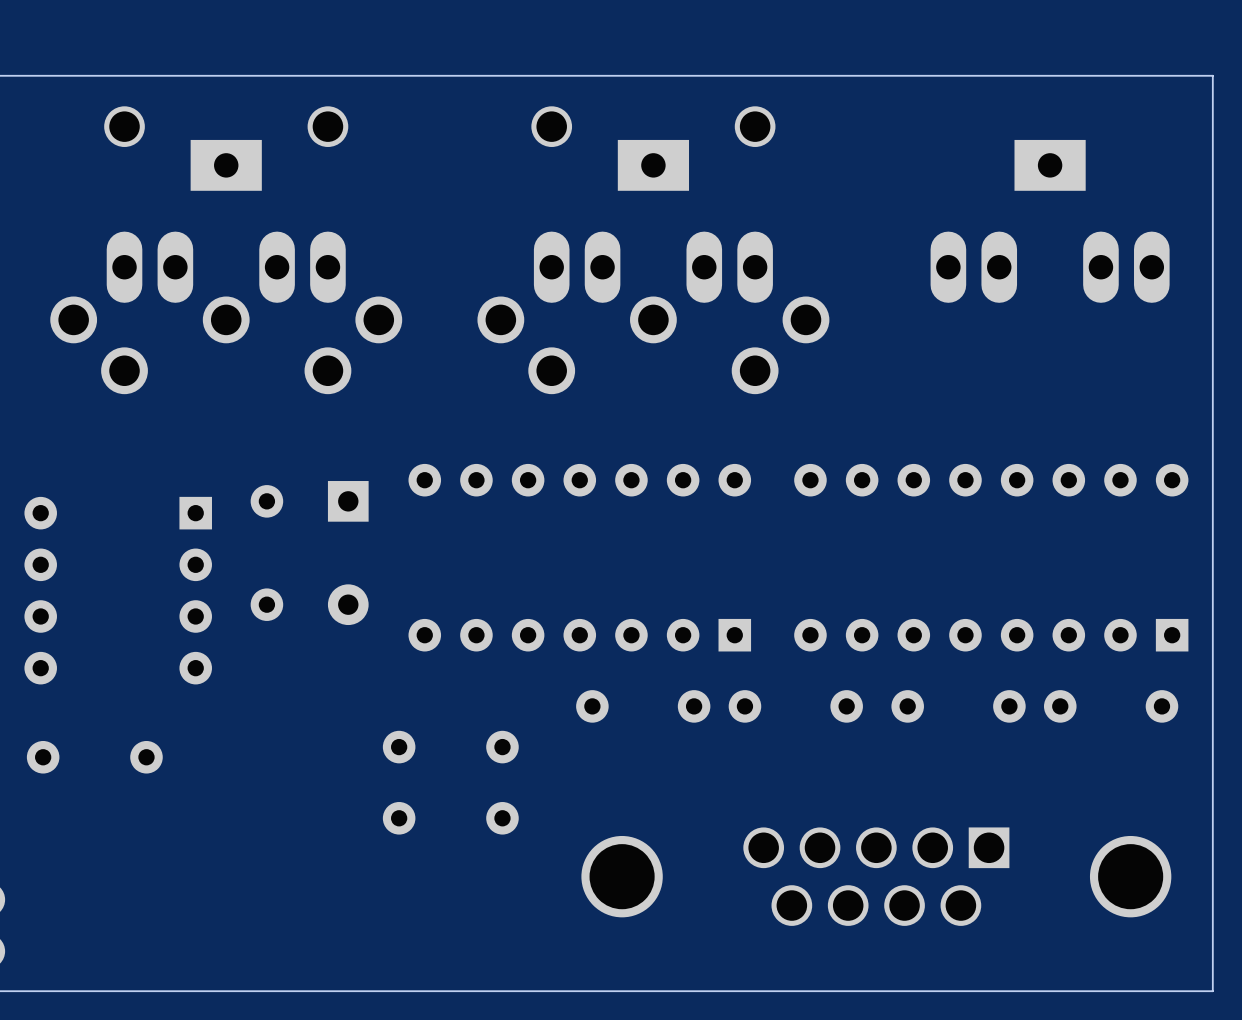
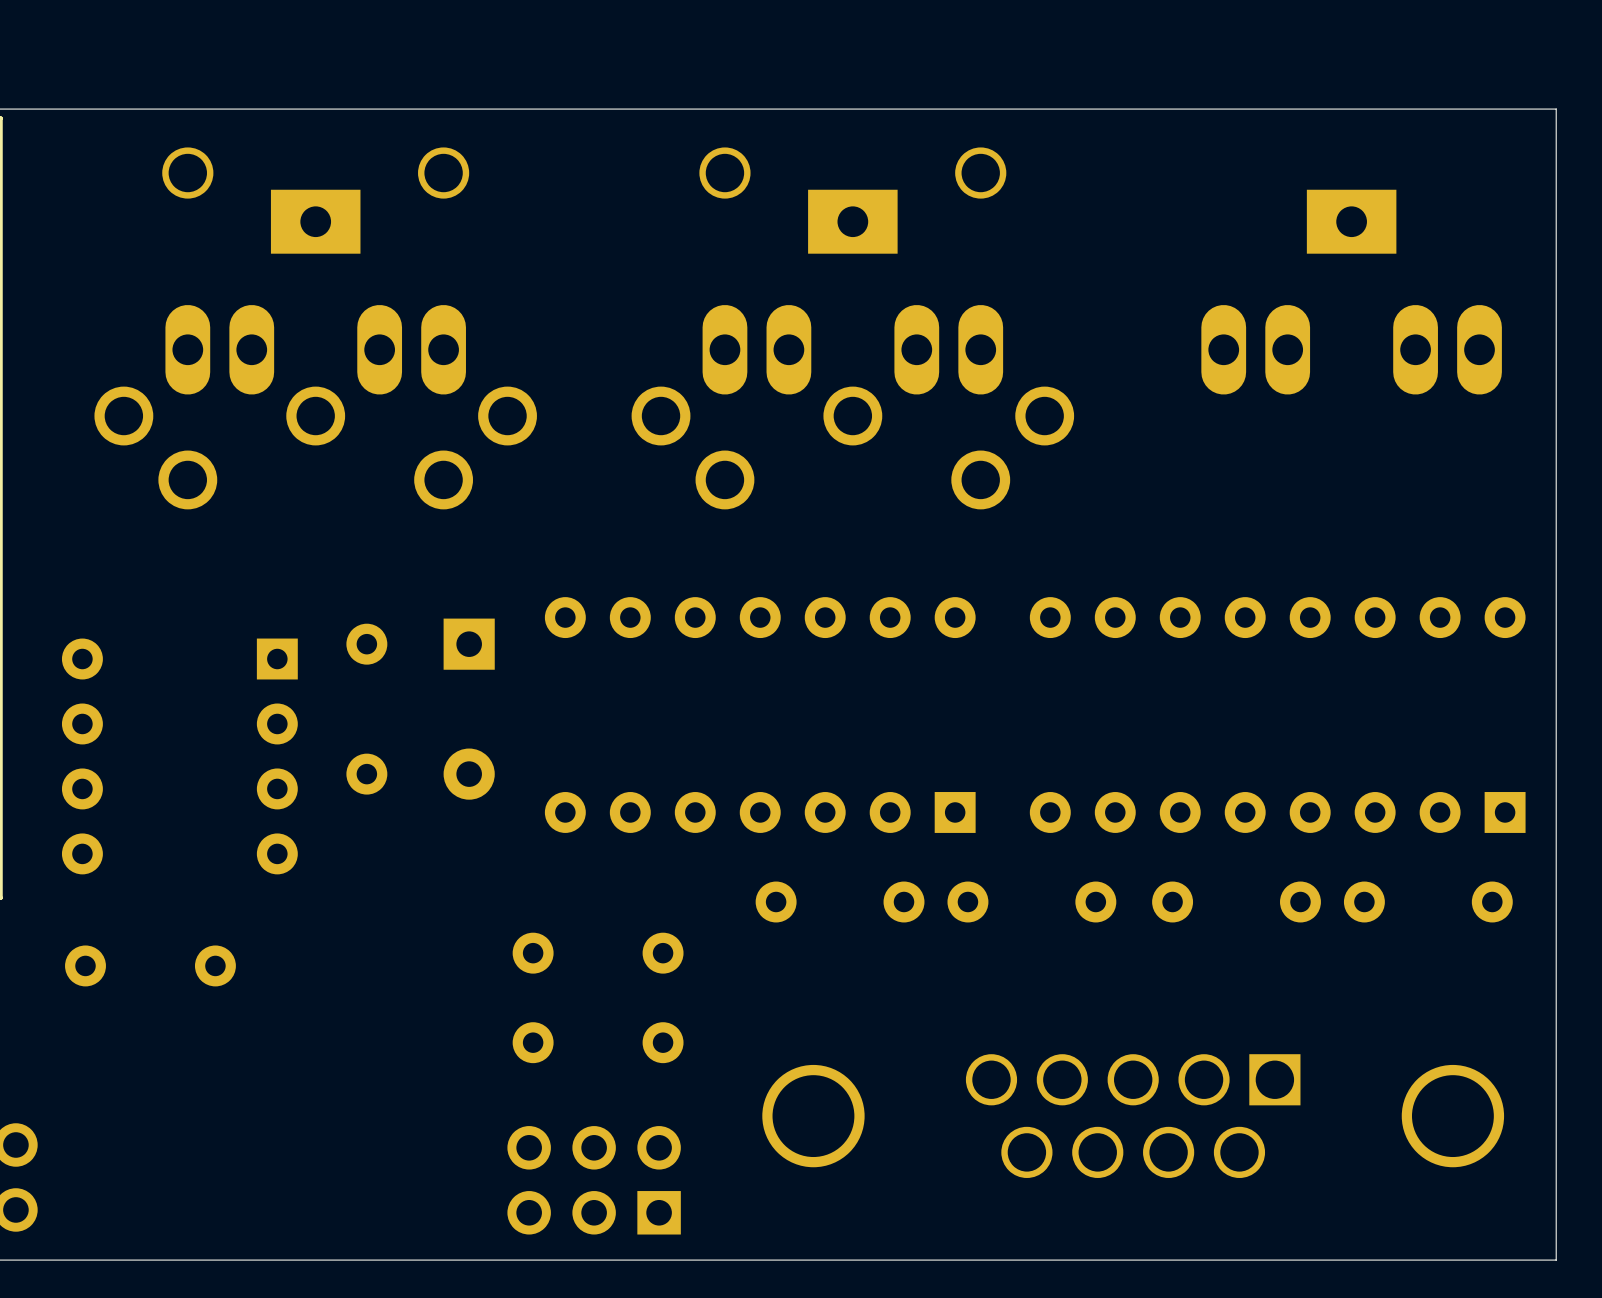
part: none -> (594, 1180)

